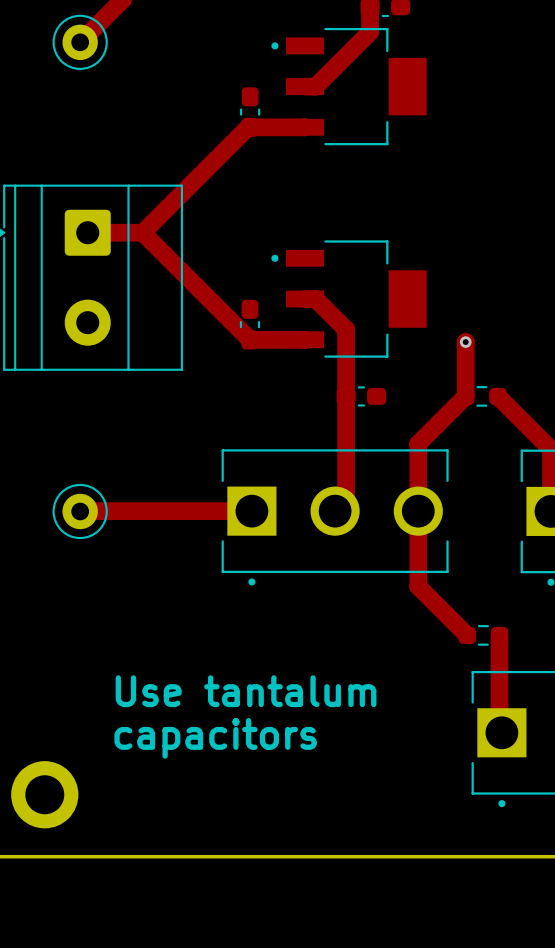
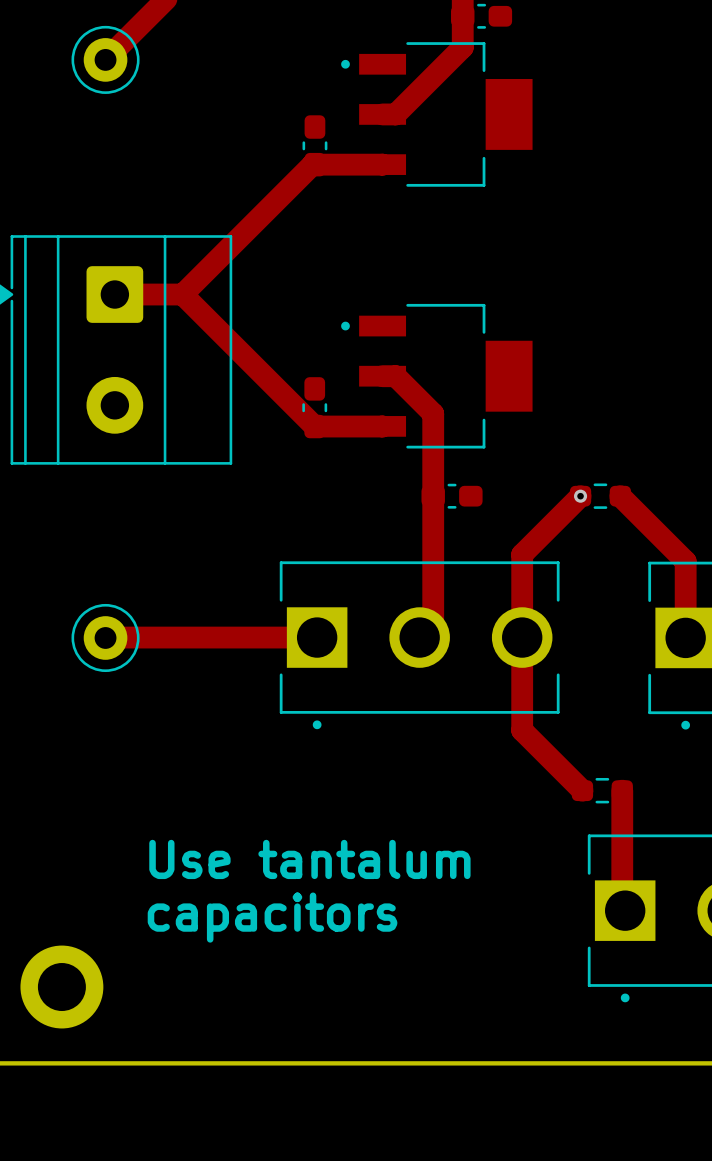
track: (465, 342) (465, 396) -> none
via: (465, 342) -> none
via: none -> (580, 496)

